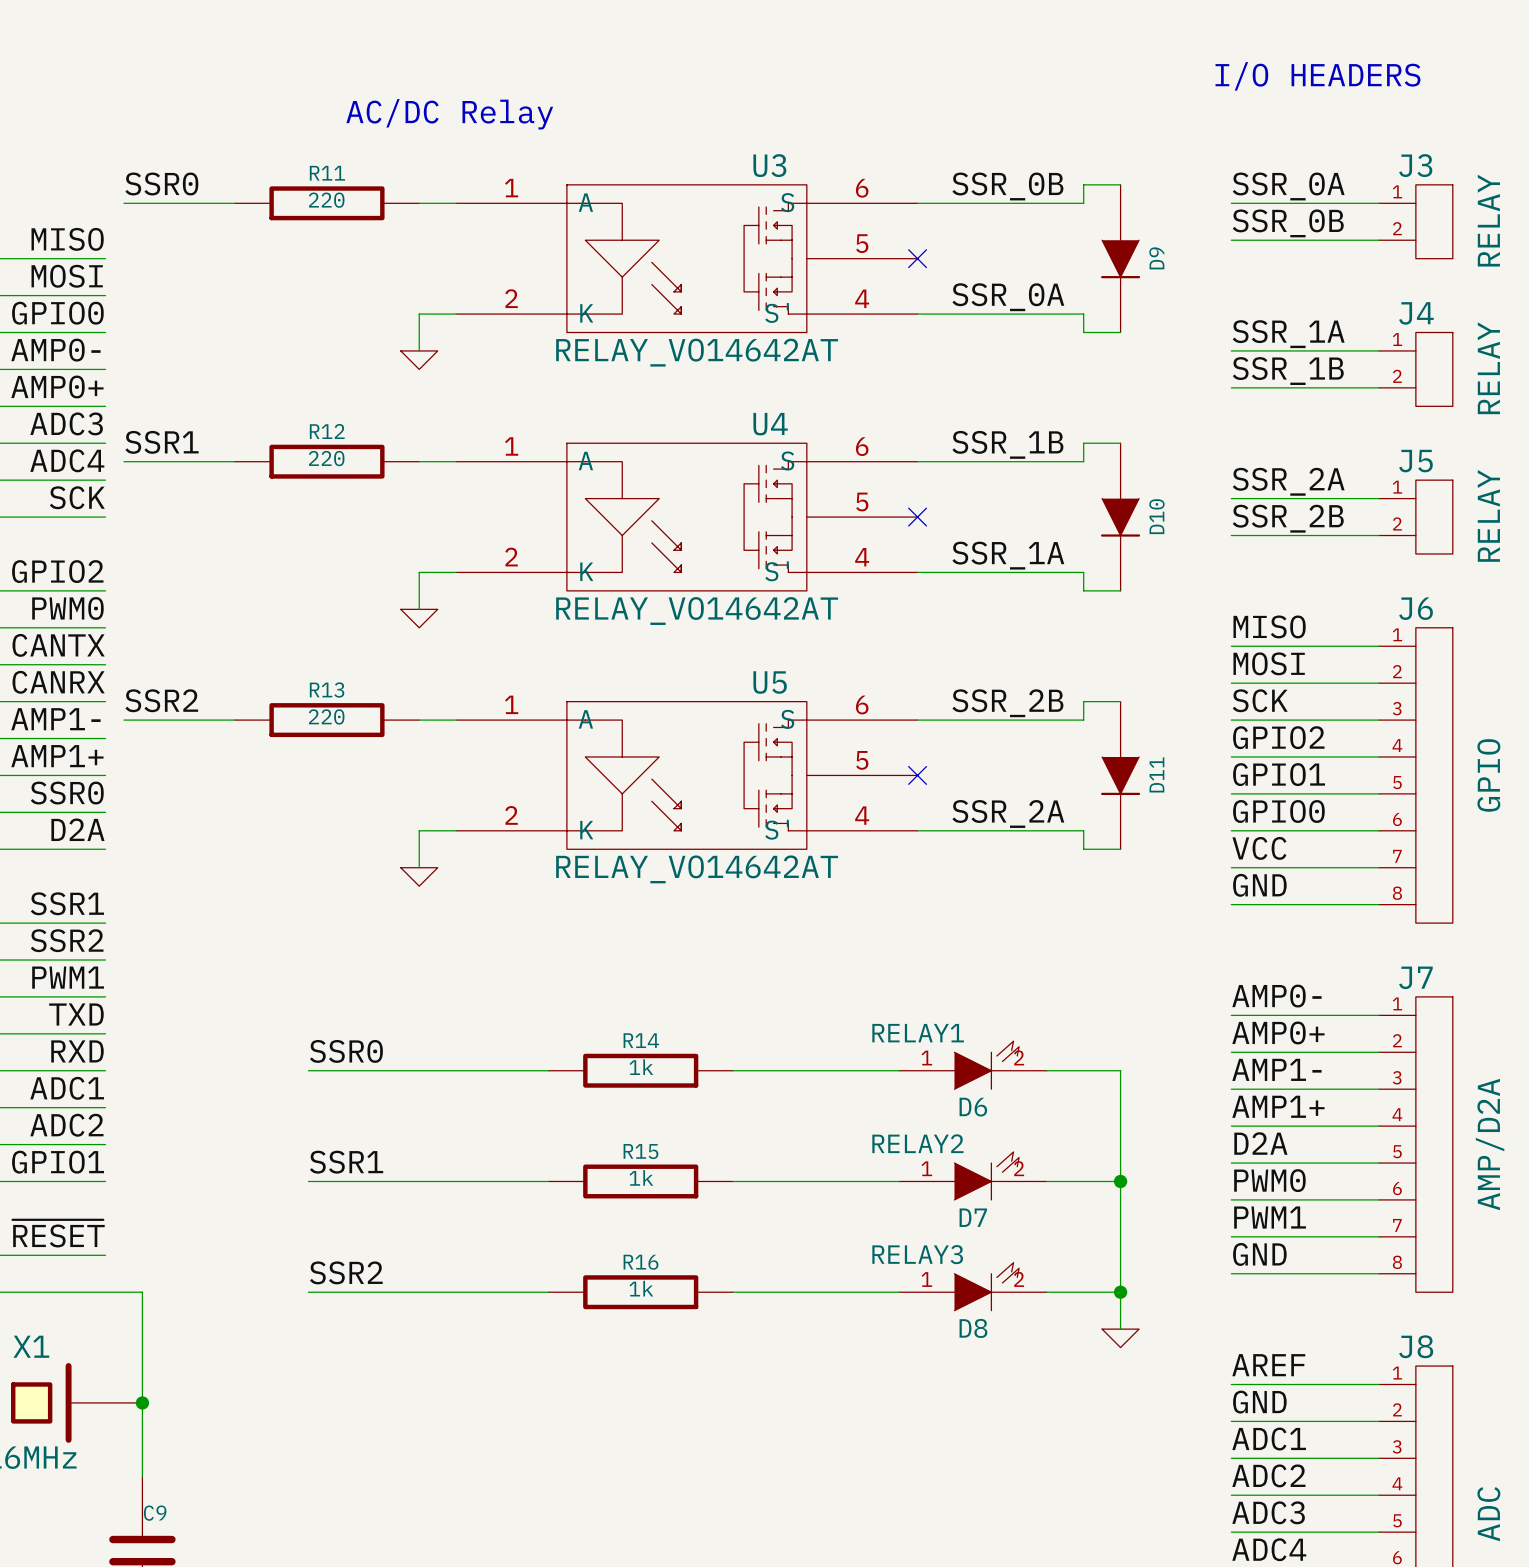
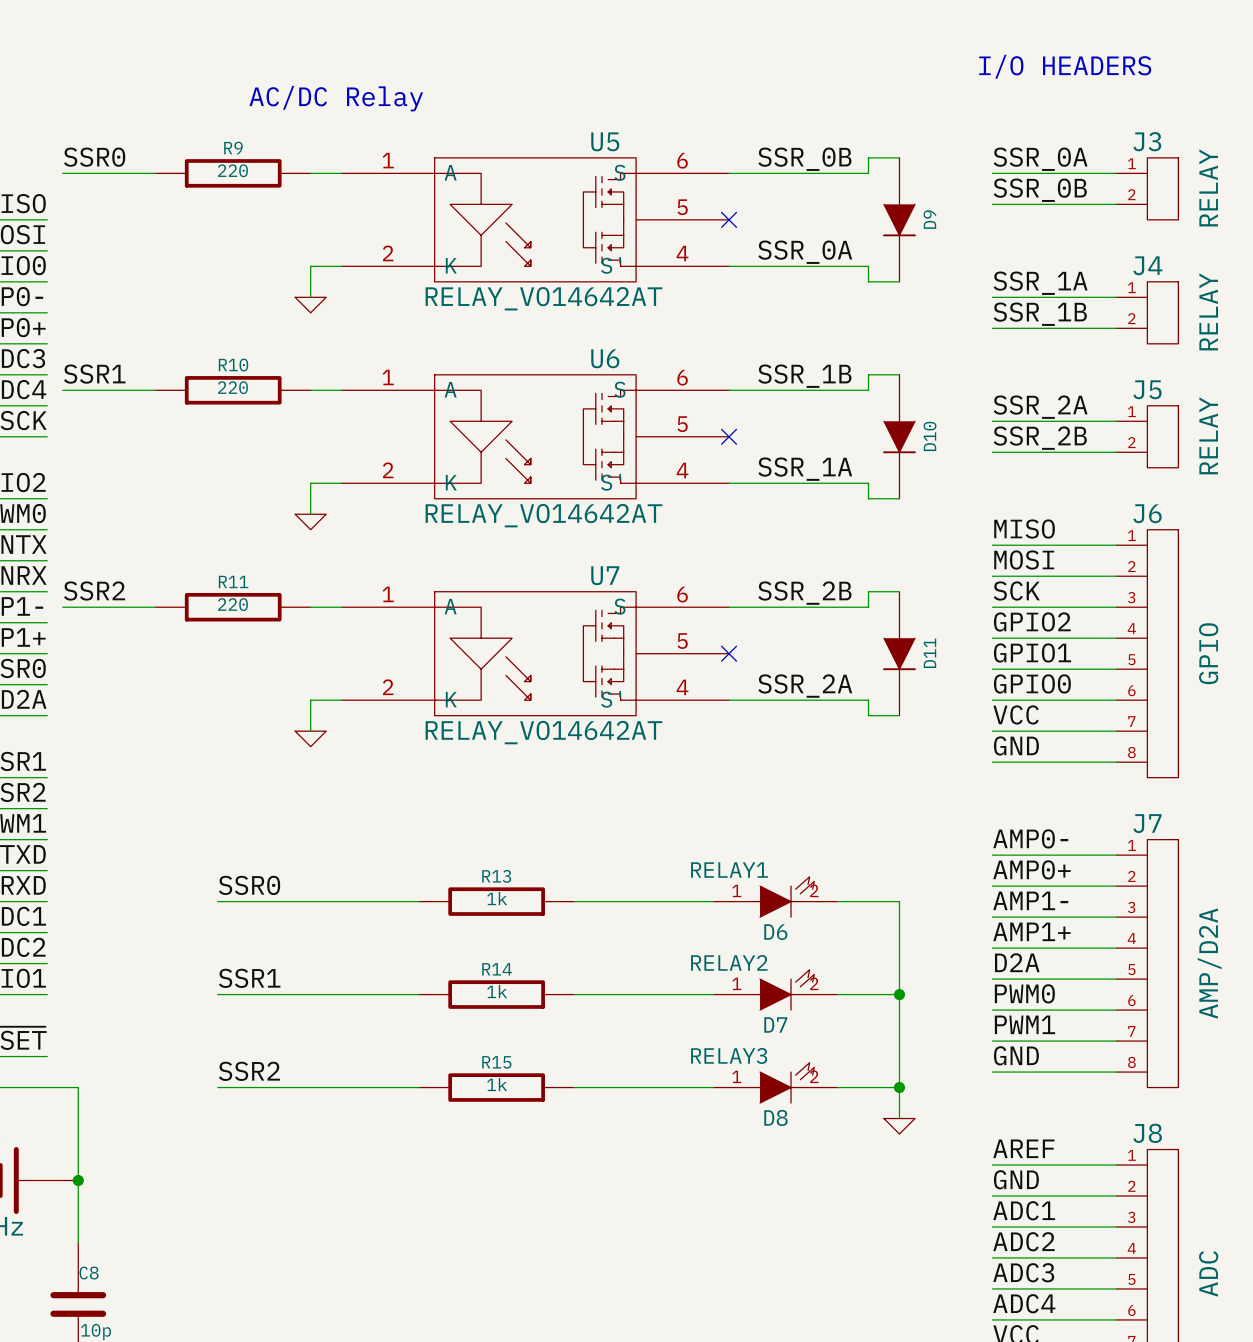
U3 name: U3 (769, 165) -> U5 (605, 141)
R11 name: R11 (327, 173) -> R9 (233, 148)
U4 name: U4 (770, 424) -> U6 (605, 358)
R12 name: R12 (327, 431) -> R10 (233, 365)
U5 name: U5 (770, 682) -> U7 (605, 575)
R13 name: R13 (327, 690) -> R11 (233, 581)
R14 name: R14 (641, 1040) -> R13 (496, 876)
R15 name: R15 (640, 1151) -> R14 (497, 969)
R16 name: R16 (641, 1262) -> R15 (496, 1062)
C9 name: C9 (155, 1513) -> C8 (89, 1273)

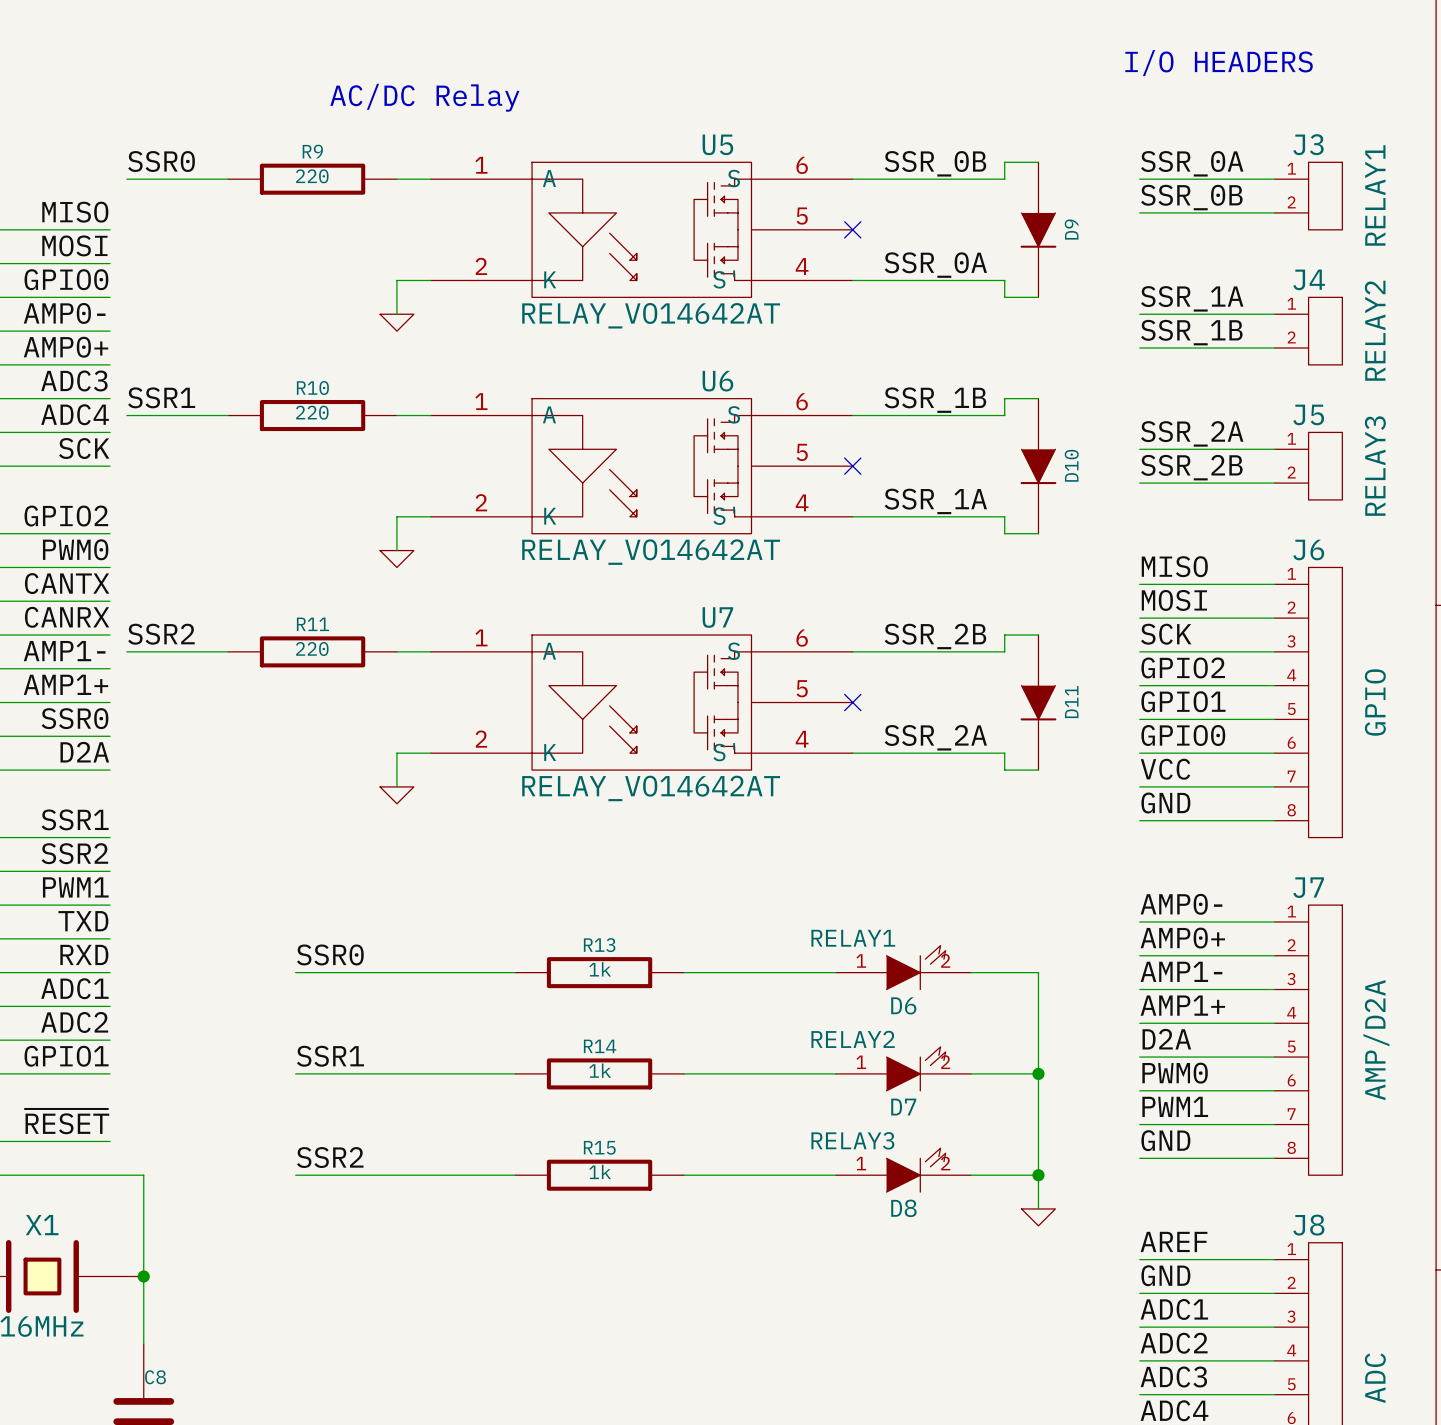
J3 value: RELAY (1208, 187) -> RELAY1 (1375, 195)
J4 value: RELAY (1208, 311) -> RELAY2 (1375, 330)
J5 value: RELAY (1208, 435) -> RELAY3 (1375, 466)

